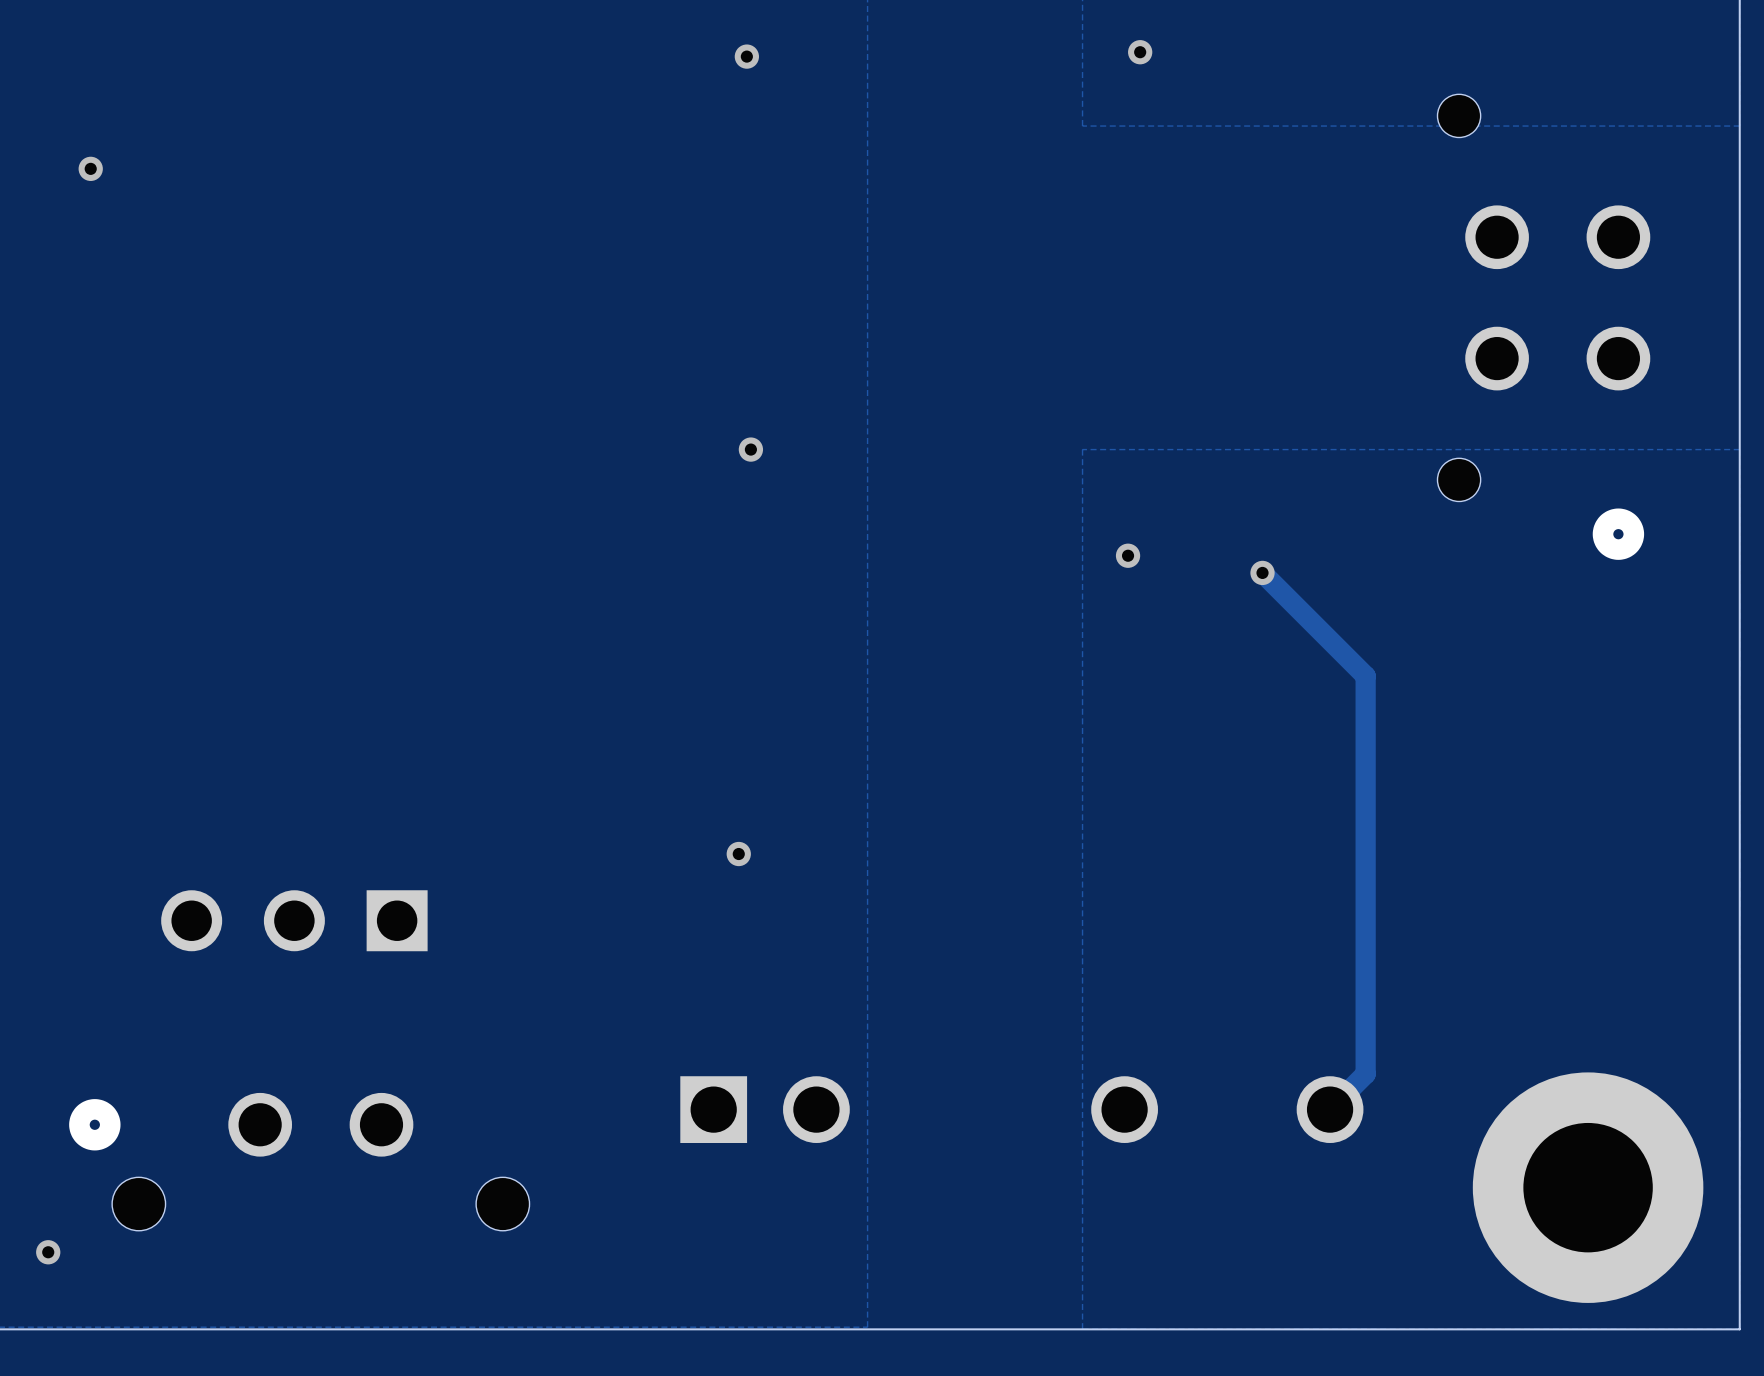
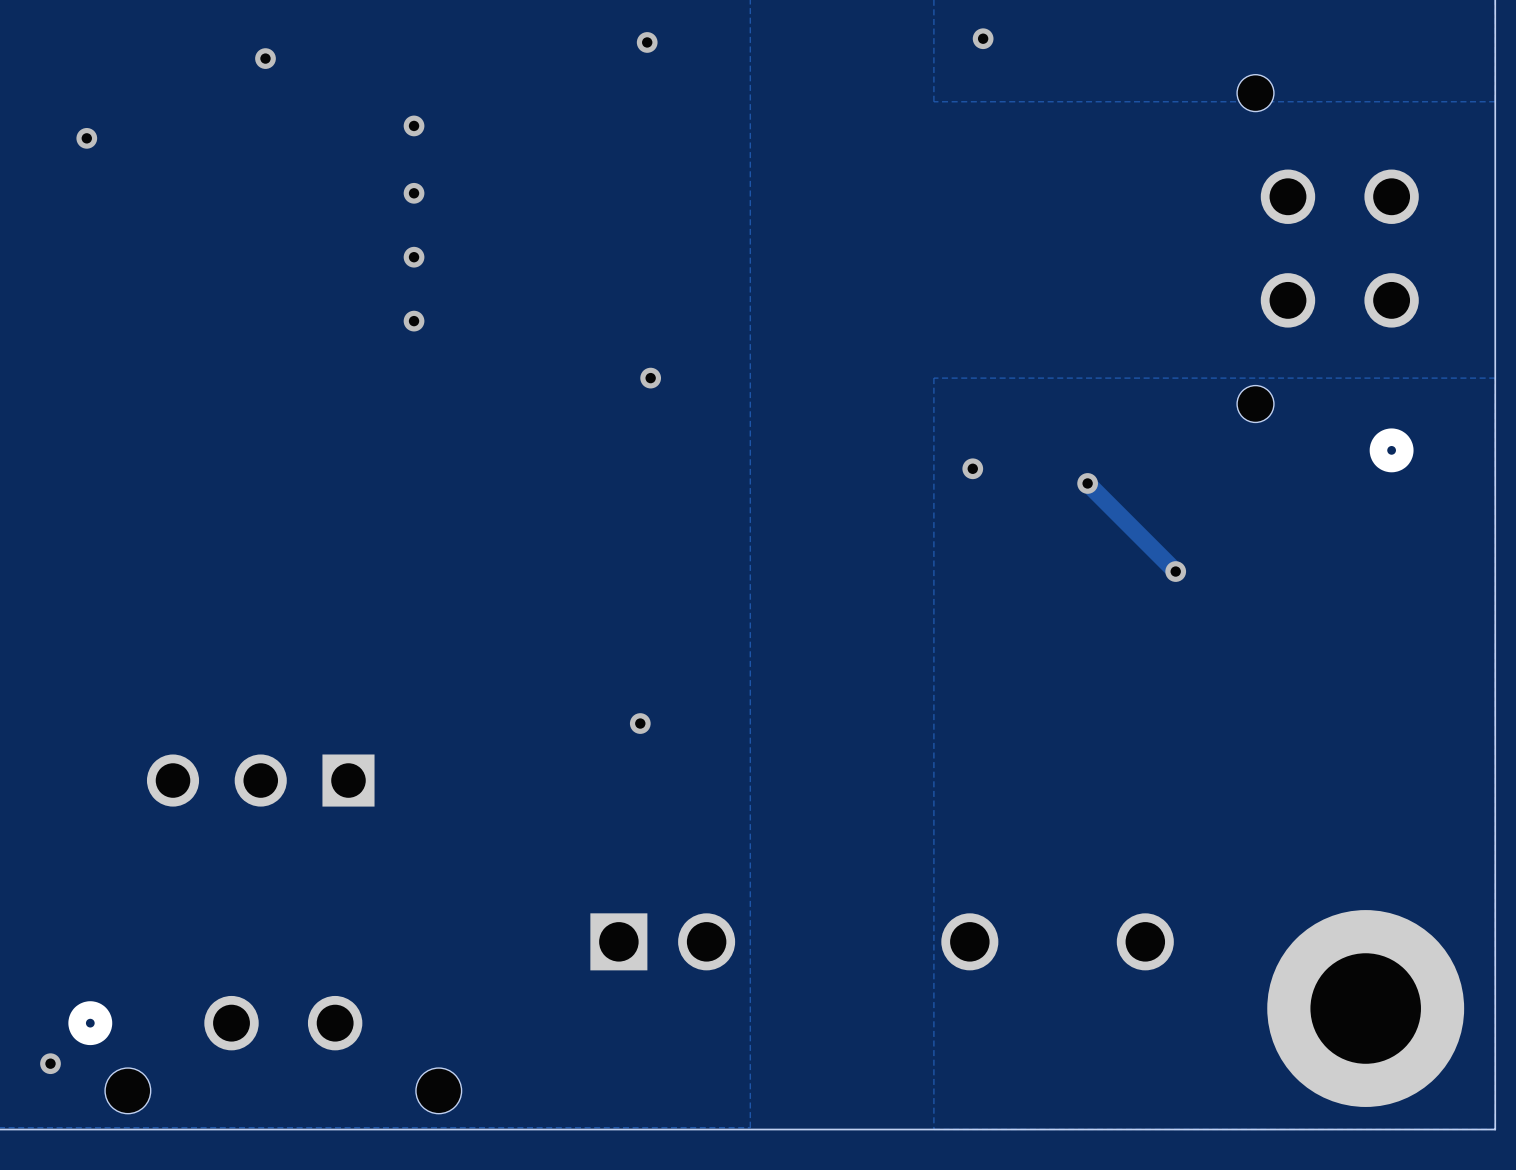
via: none -> (265, 58)
via: none -> (414, 125)
via: none -> (414, 193)
via: none -> (414, 257)
via: none -> (414, 321)
track: (1365, 676) (1365, 1074) (1330, 1109) -> none
via: none -> (1175, 571)
part position: (299, 1161) -> (264, 1054)

